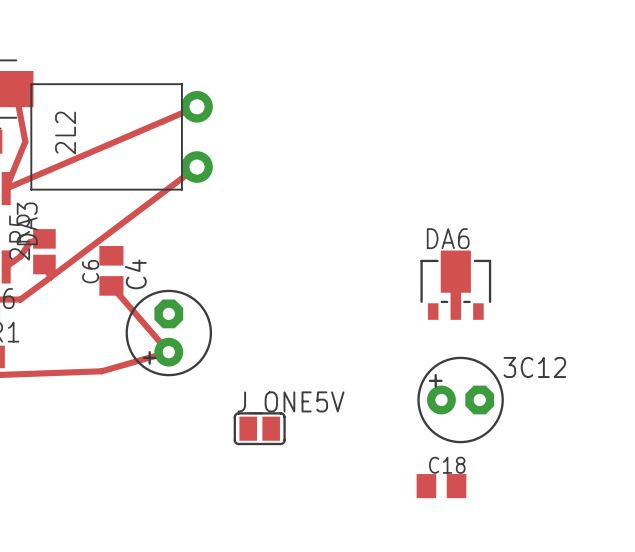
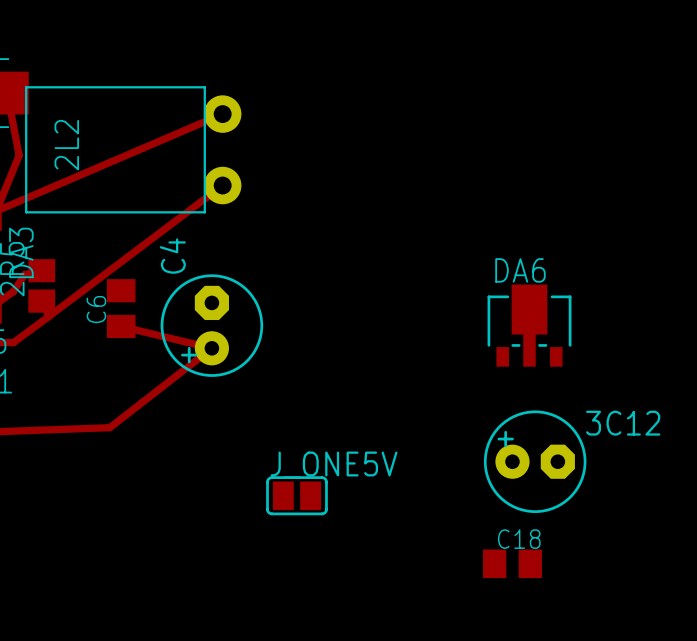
top track: (111, 285) (168, 352) (101, 371) -> (121, 326) (211, 348) (109, 427)
C4 position: (168, 333) -> (211, 325)

